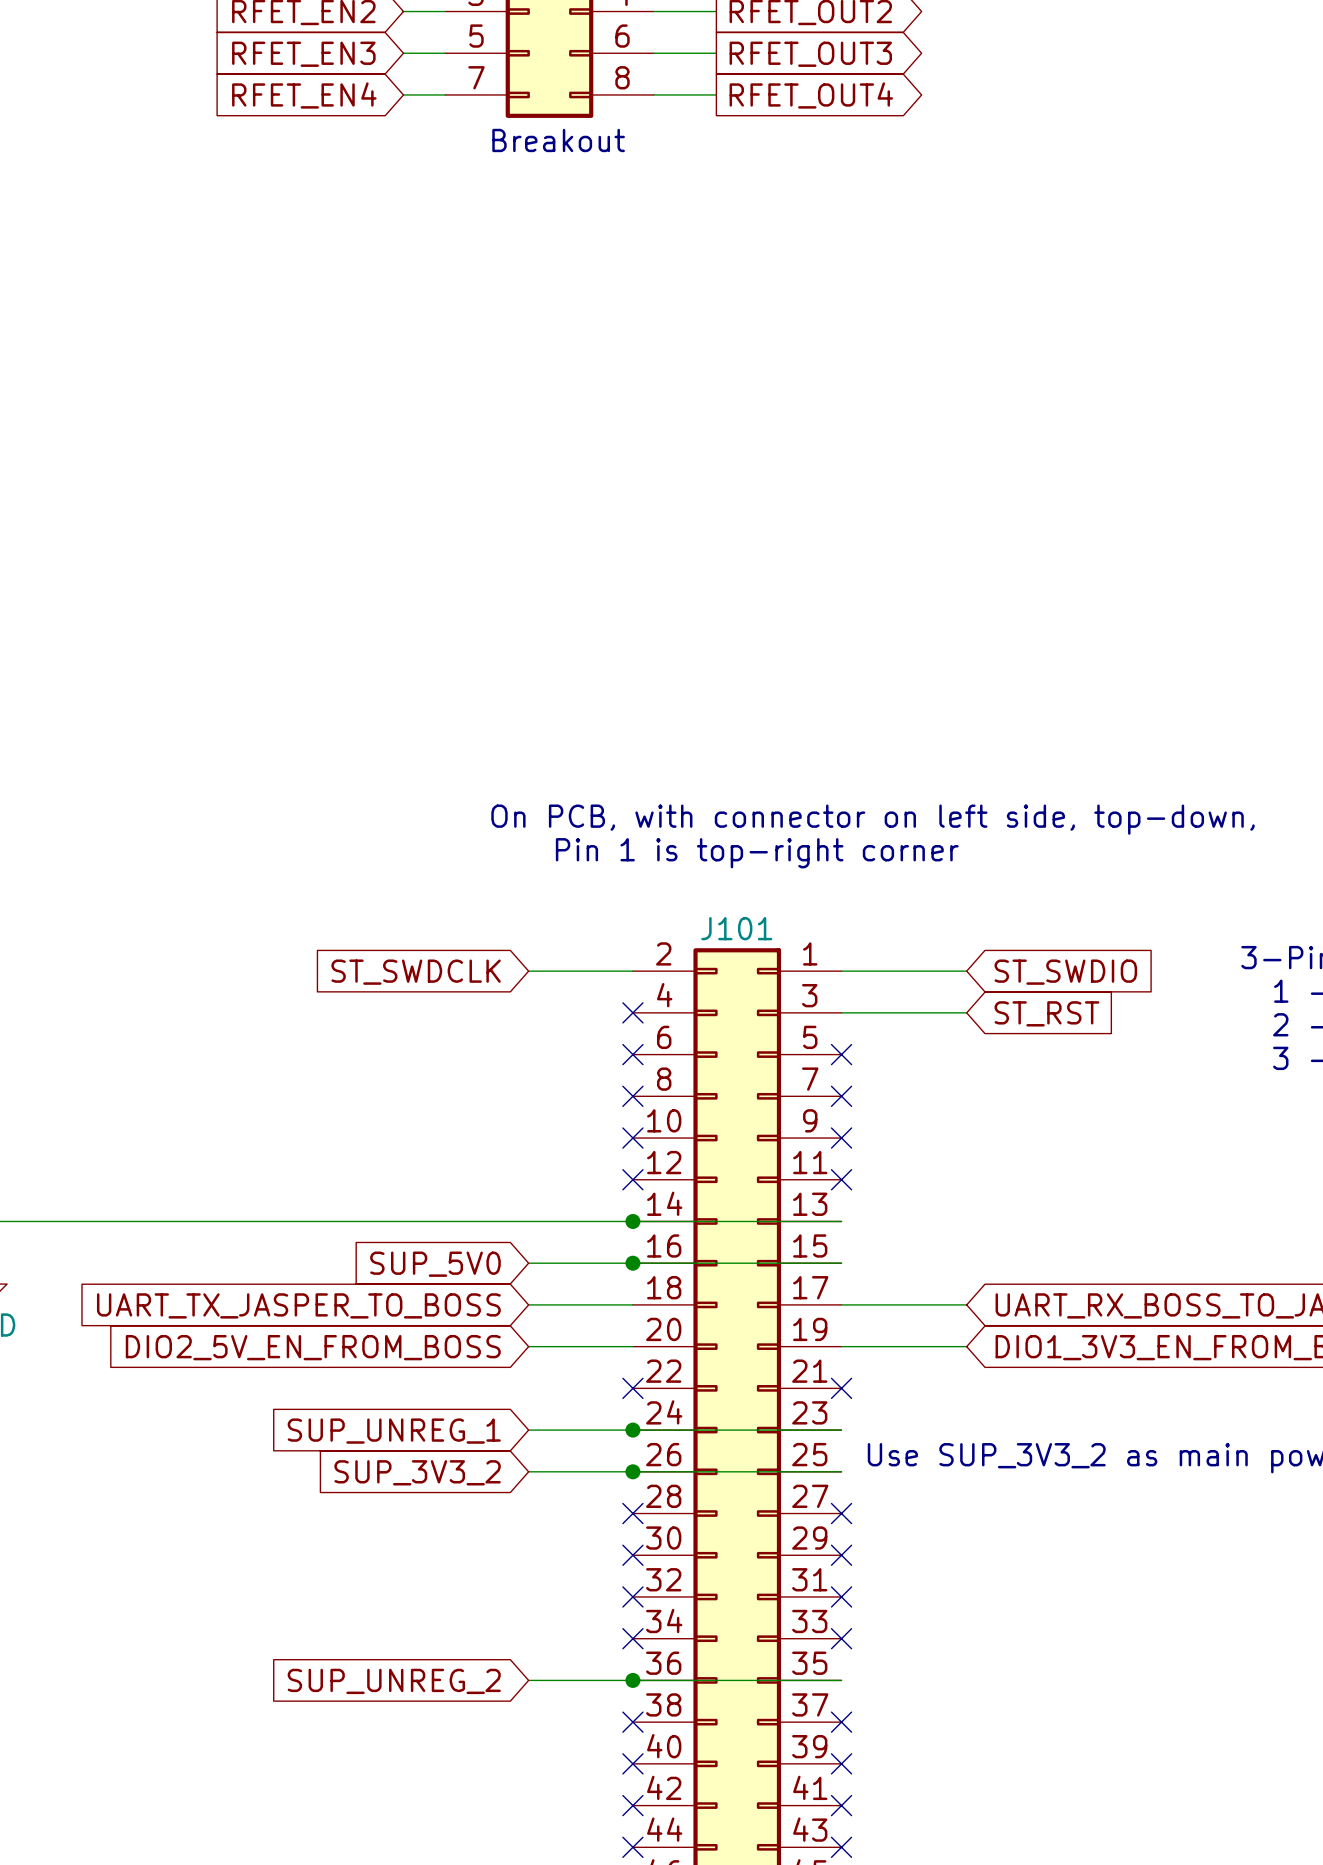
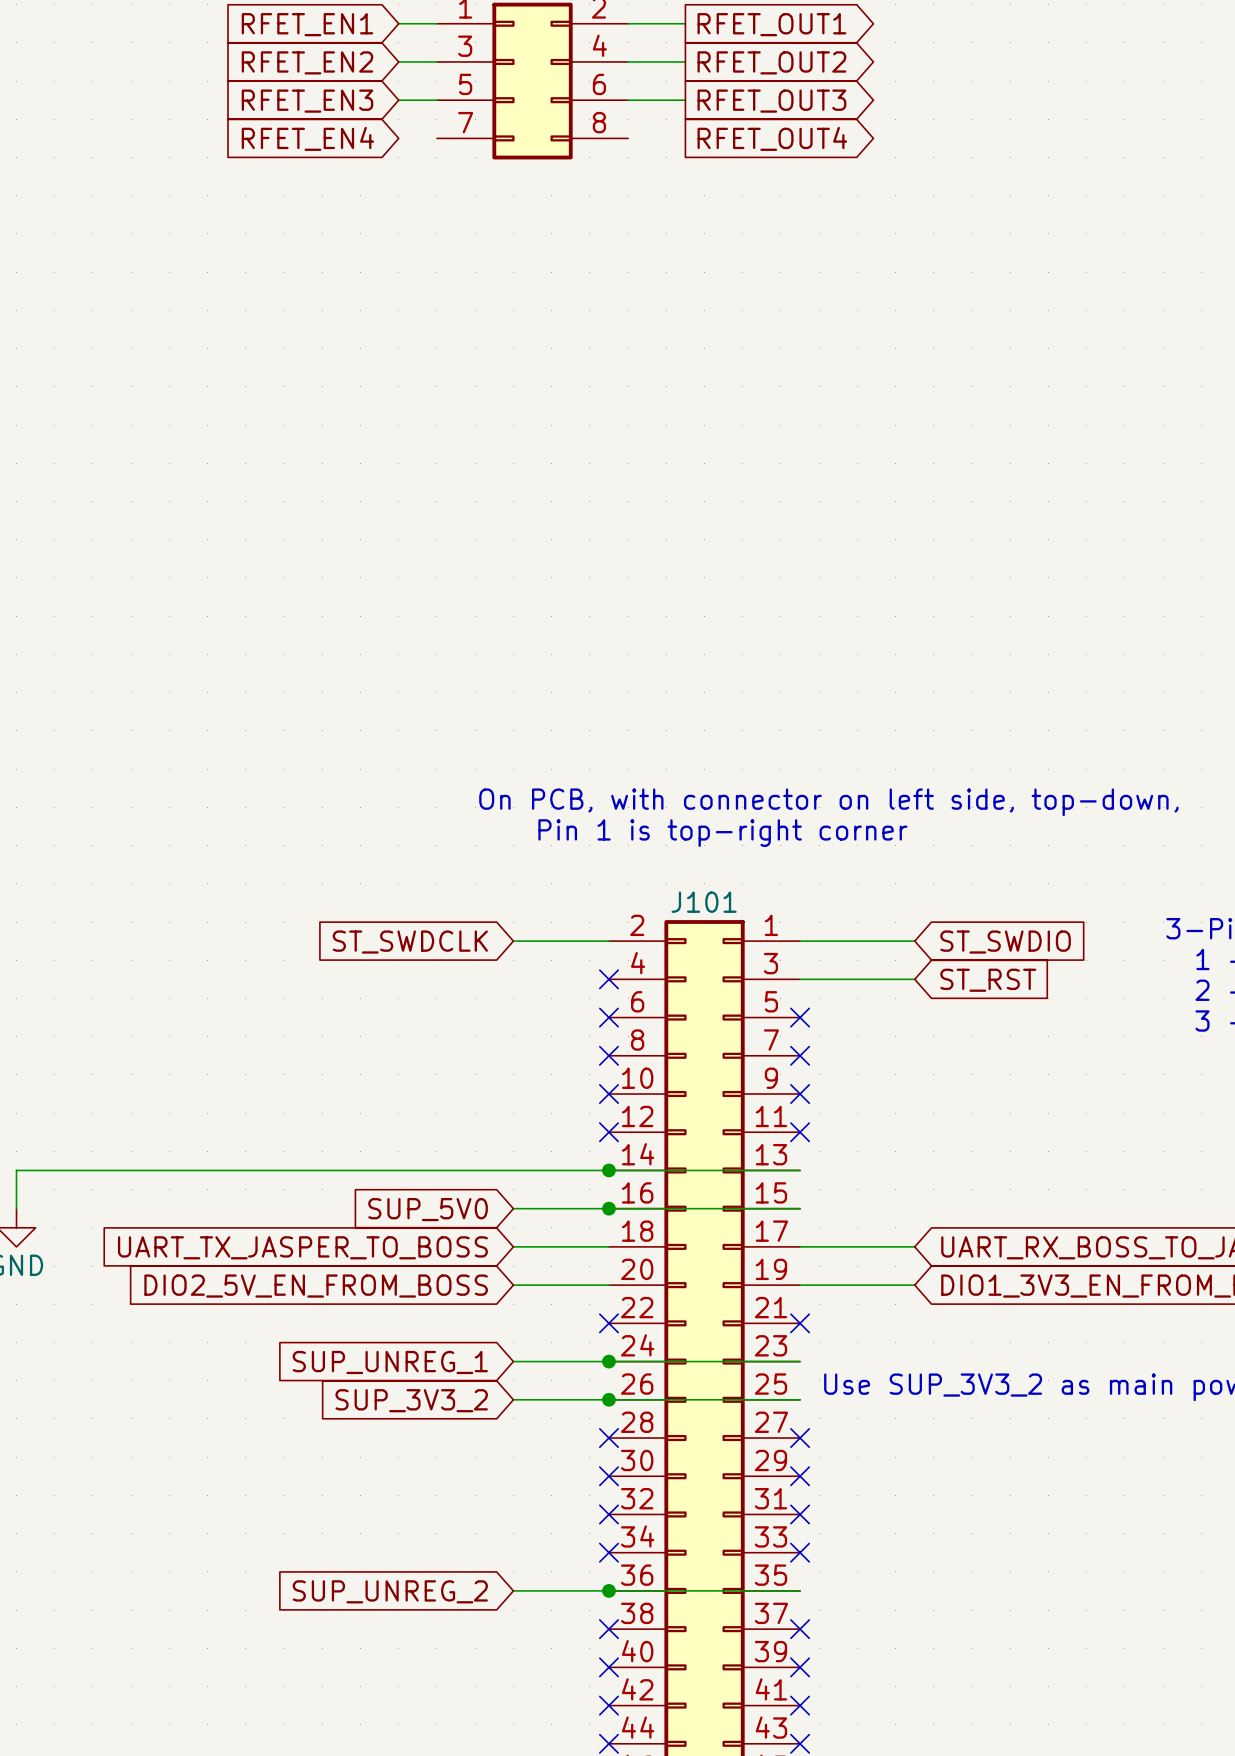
wire: (403, 94) (445, 94) -> none
wire: (653, 94) (716, 94) -> none
text: Breakout (558, 140) -> none

